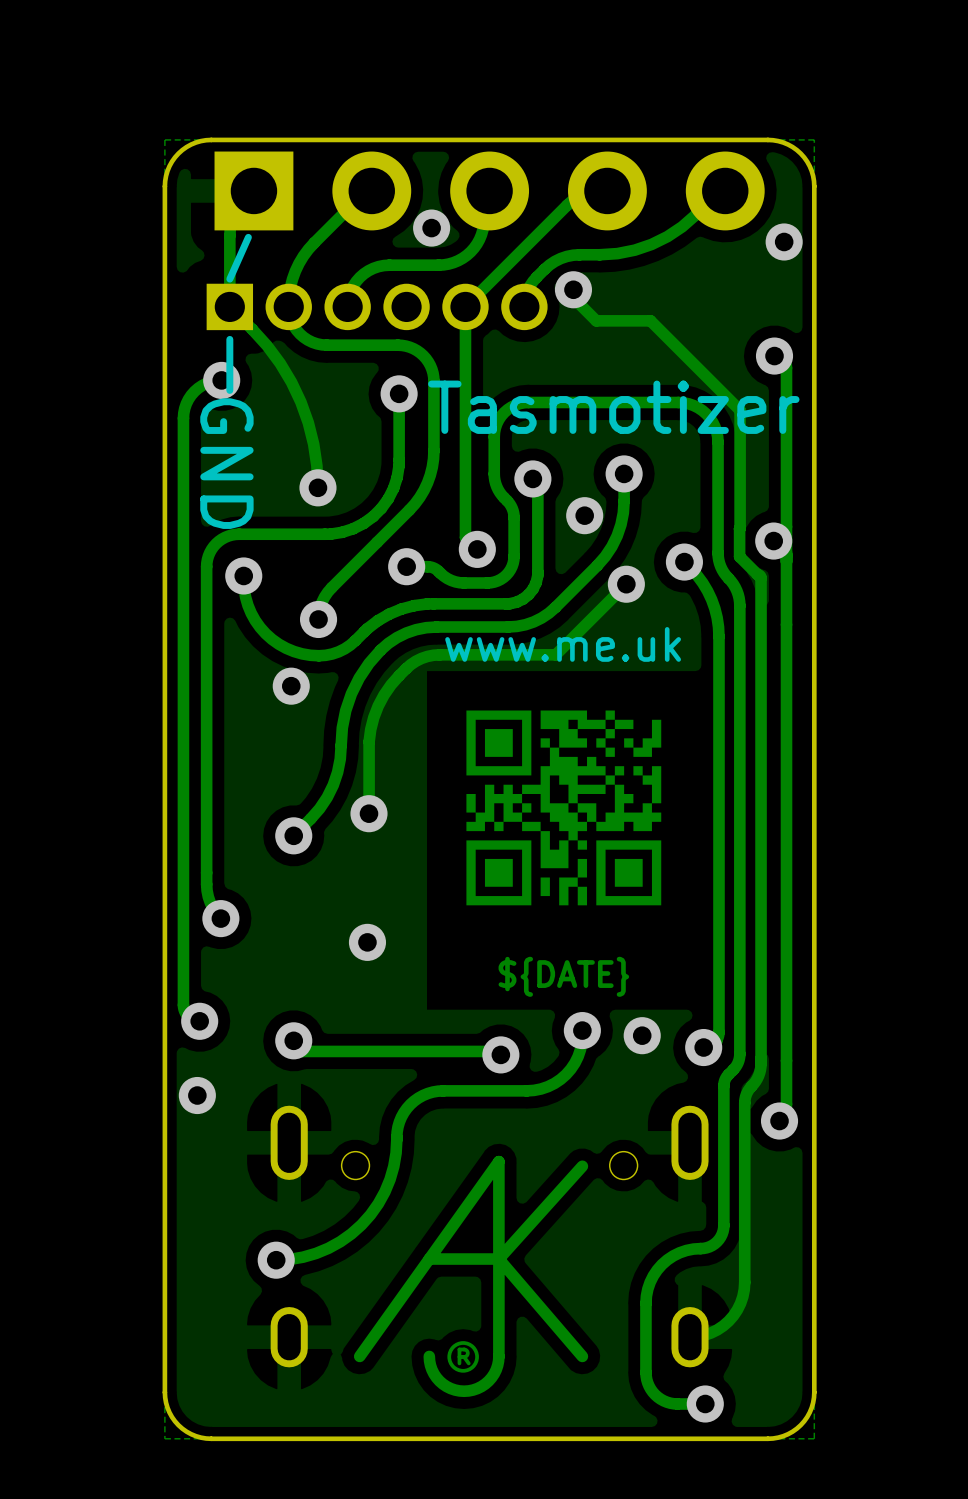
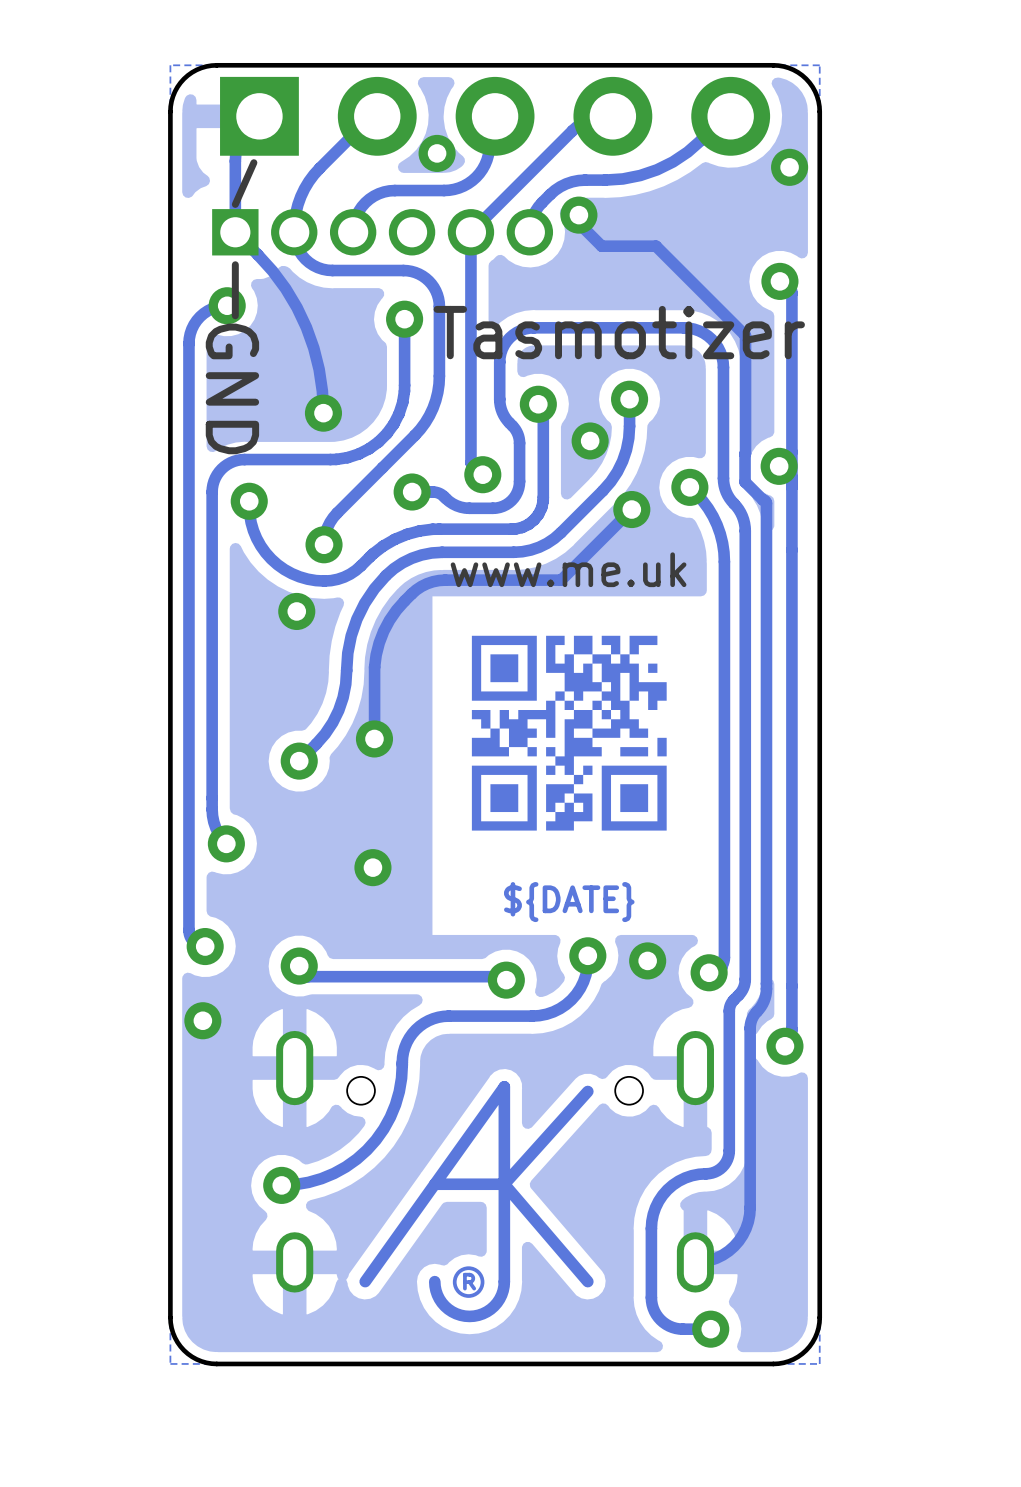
part footprint: [466, 710, 662, 906] -> [471, 635, 667, 831]

